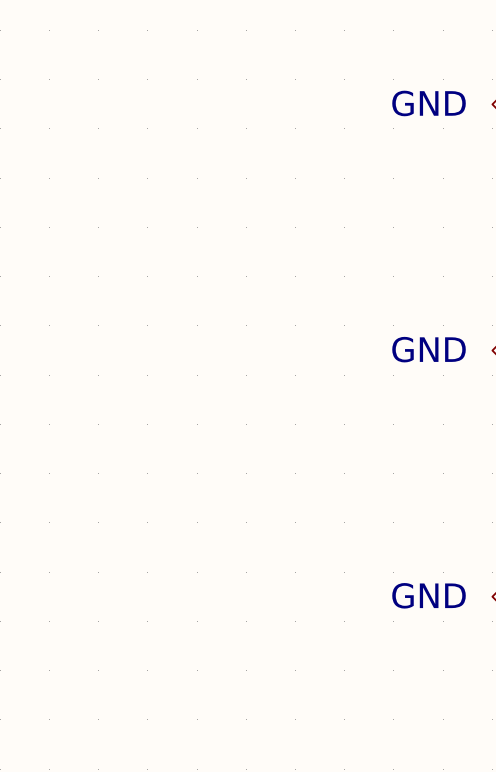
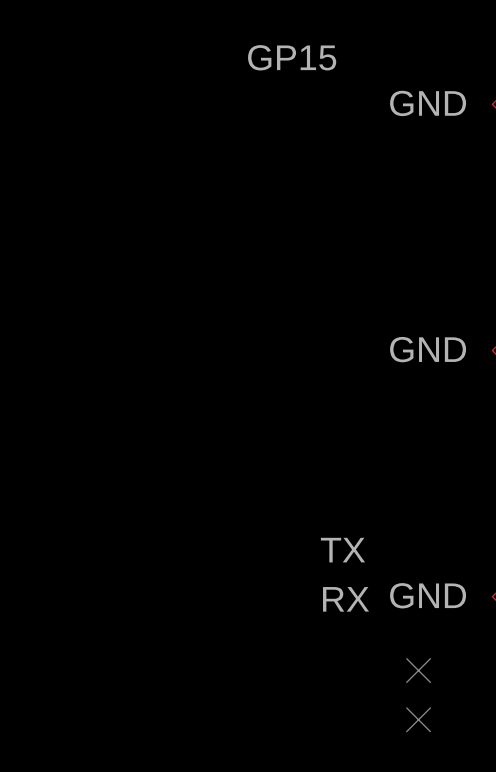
label: none -> GP15 (292, 57)
label: none -> TX (342, 550)
label: none -> RX (346, 599)
no-connect mark: none -> (418, 670)
no-connect mark: none -> (418, 719)

